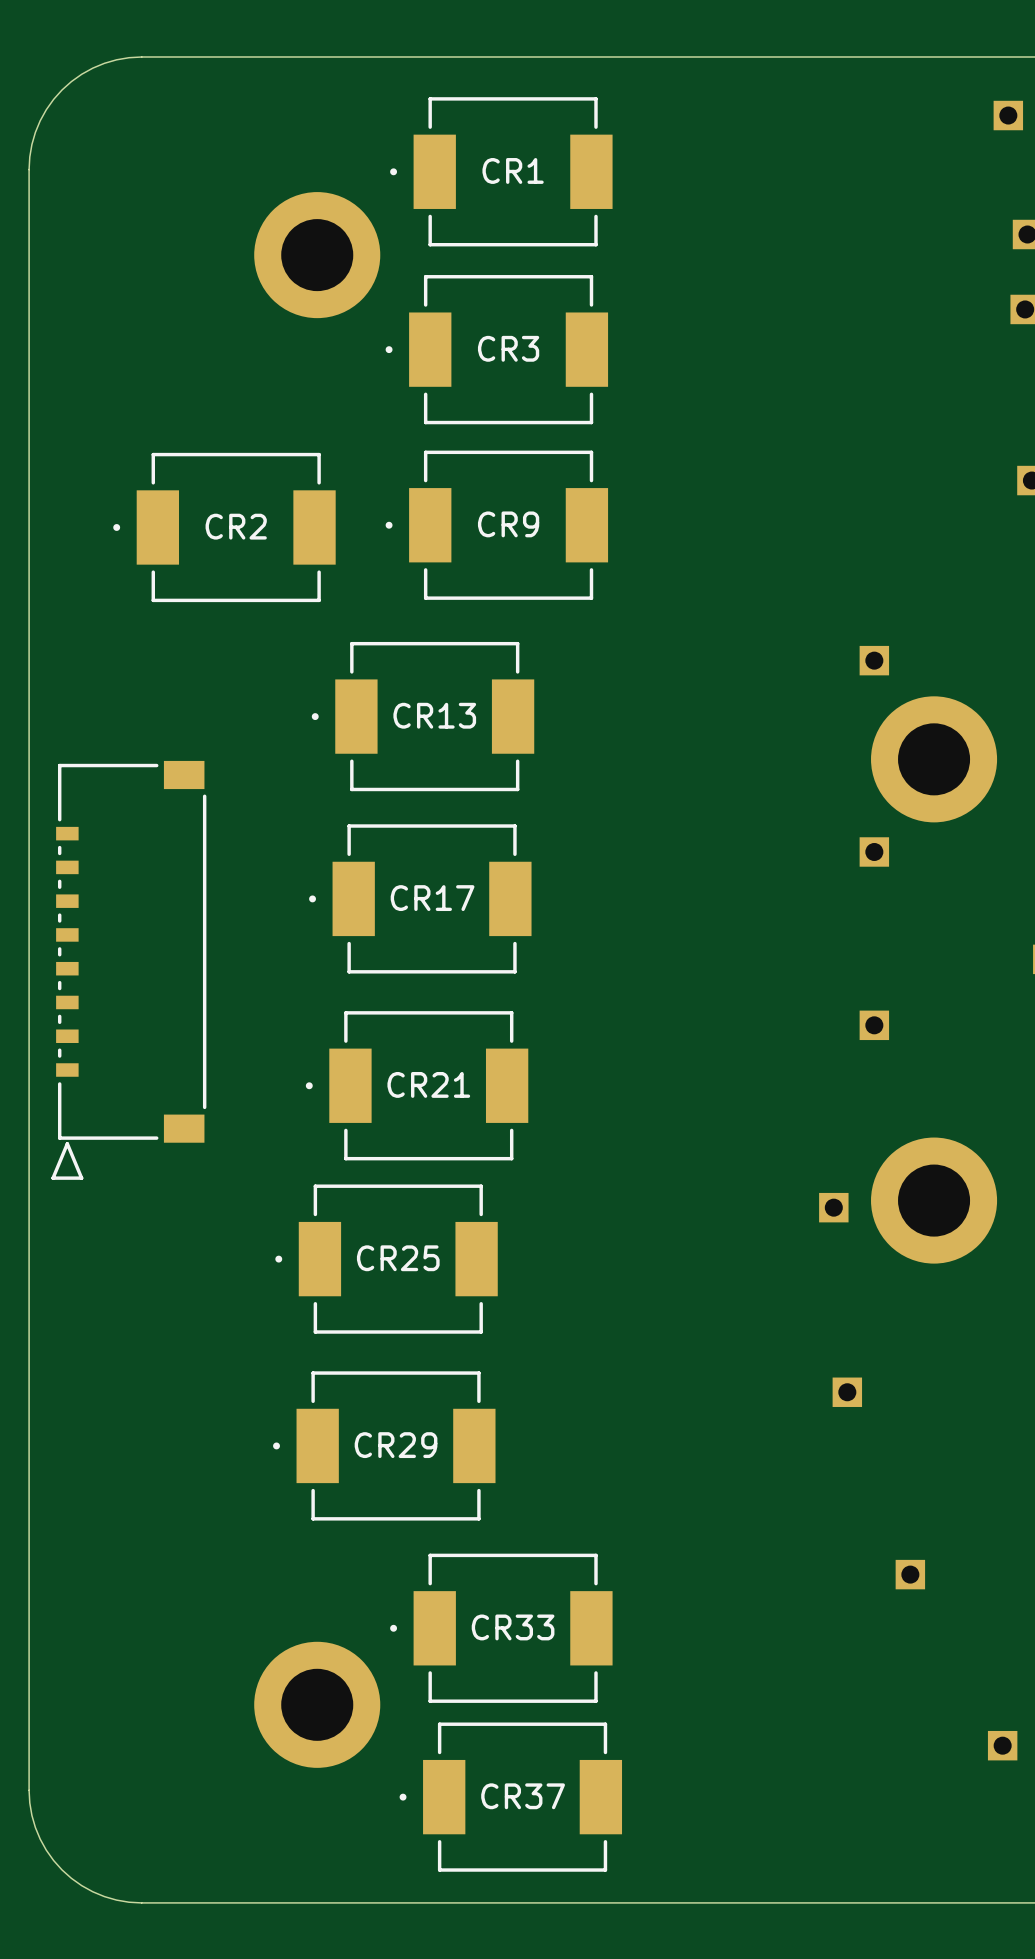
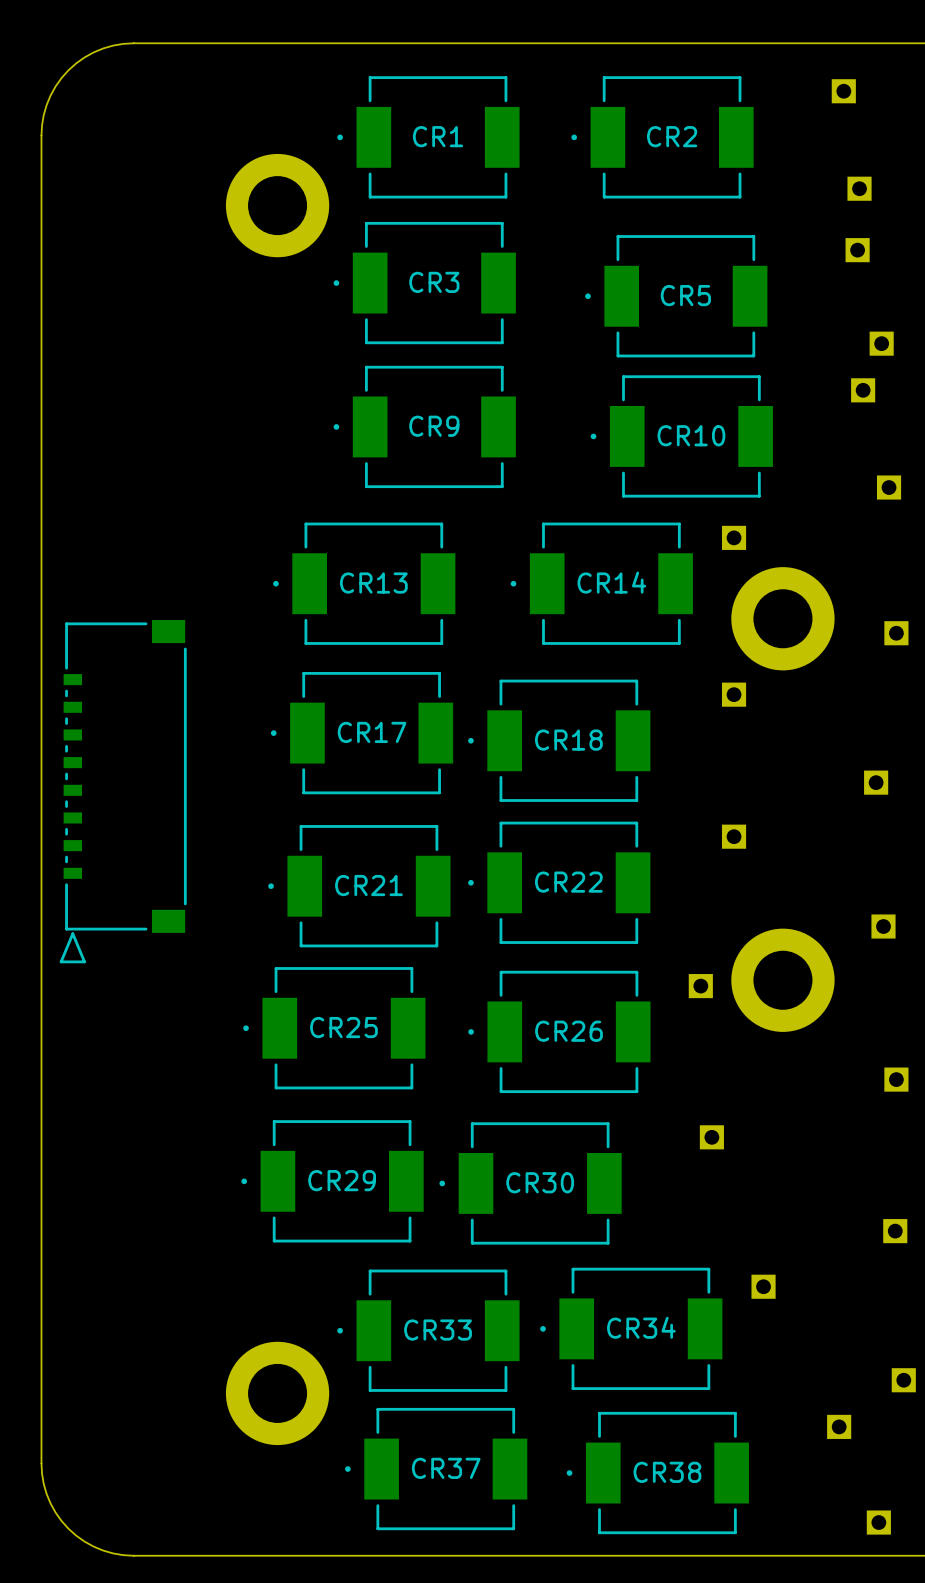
CR5: none -> (676, 296)
CR2 position: (224, 527) -> (662, 137)
CR10: none -> (681, 436)
CR14: none -> (601, 583)
CR18: none -> (559, 740)
CR22: none -> (559, 882)
CR26: none -> (559, 1031)
CR30: none -> (530, 1183)
CR34: none -> (631, 1328)
CR38: none -> (657, 1473)

